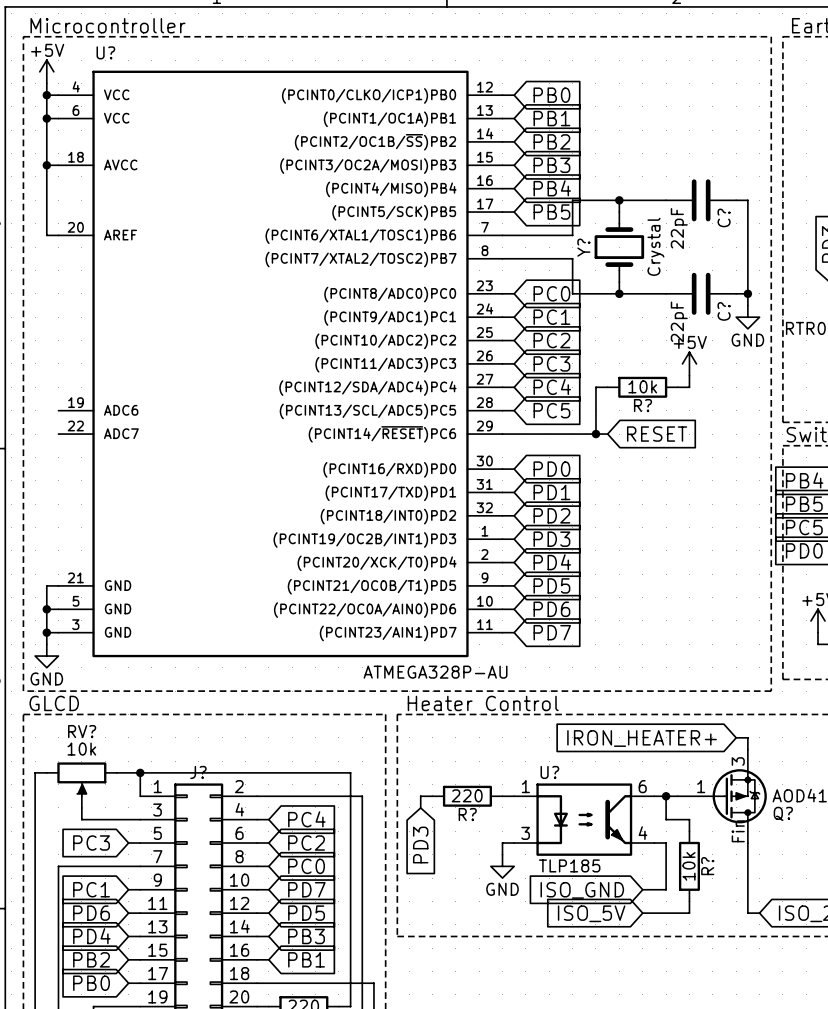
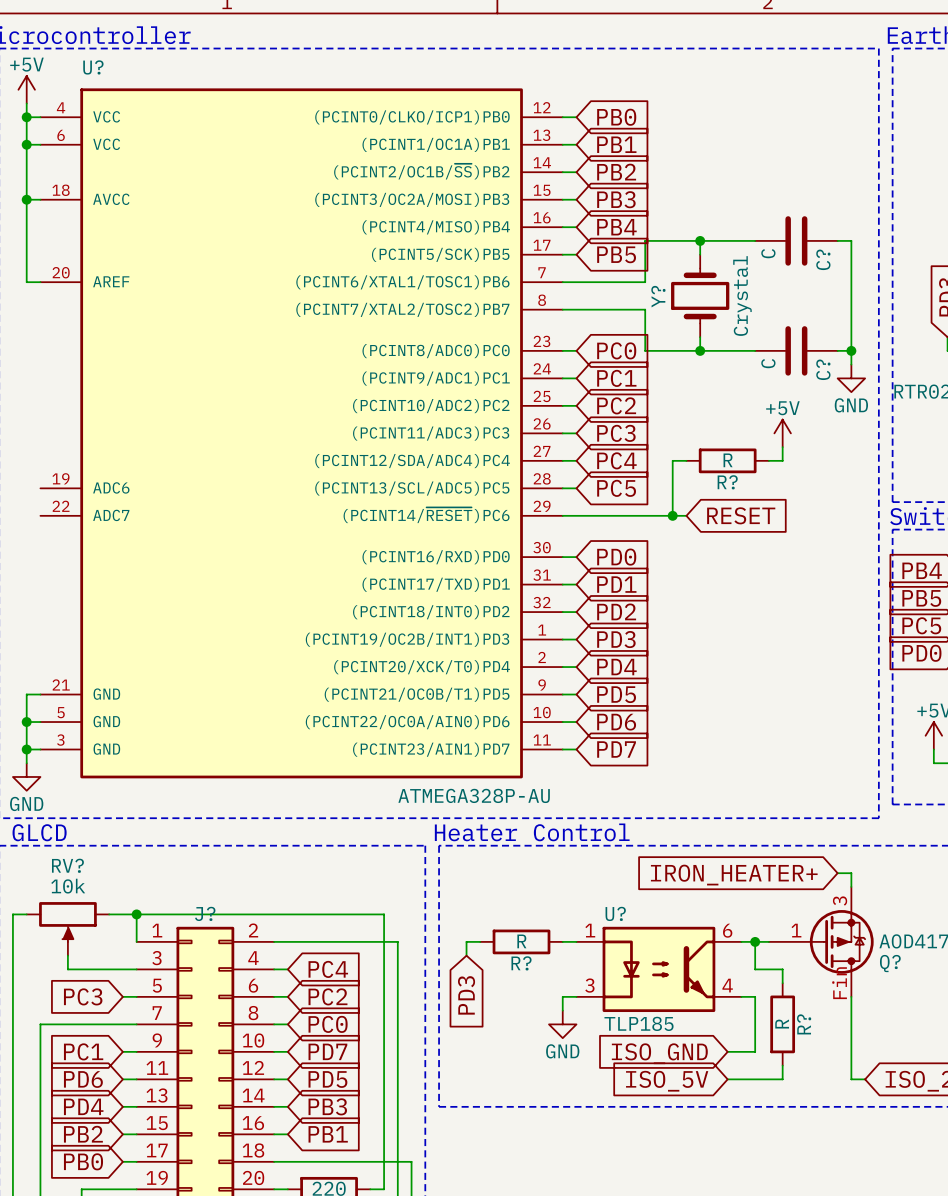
C? value: 22pF (679, 228) -> C (768, 253)
C? value: 22pF (679, 322) -> C (768, 363)
R? value: 10k (642, 386) -> R (728, 460)
R? value: 220 (467, 795) -> R (521, 941)
R? value: 10k (689, 866) -> R (782, 1024)

